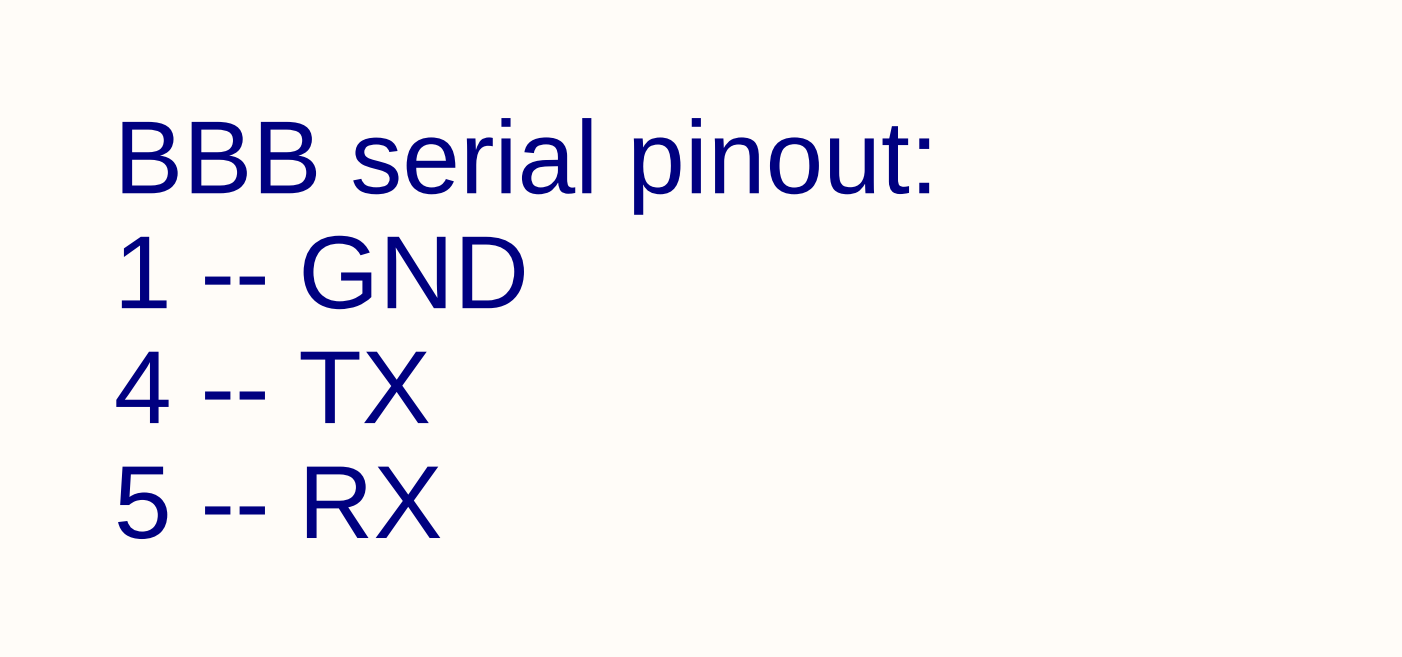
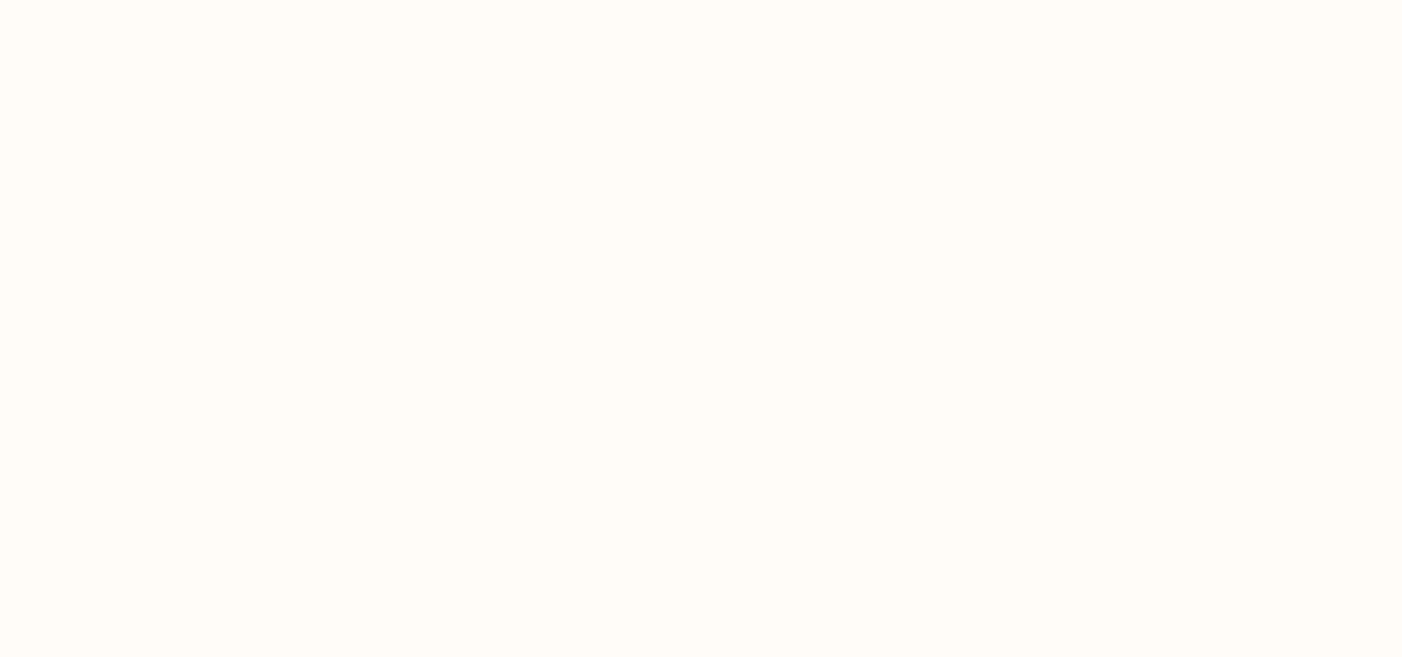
text: BBB serial pinout: (525, 166) -> none
text: 1 -- GND (322, 272) -> none
text: 4 -- TX (272, 387) -> none
text: 5 -- RX (279, 502) -> none

